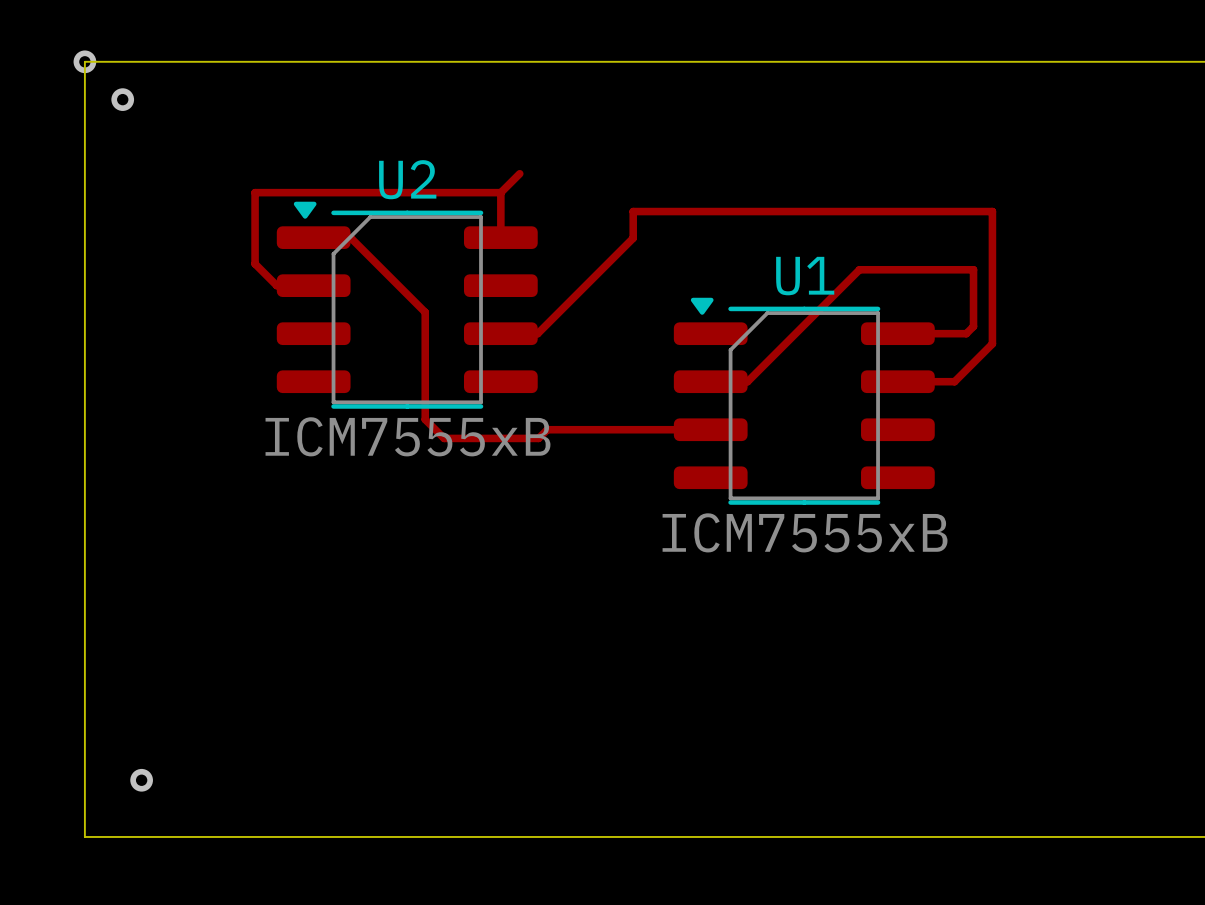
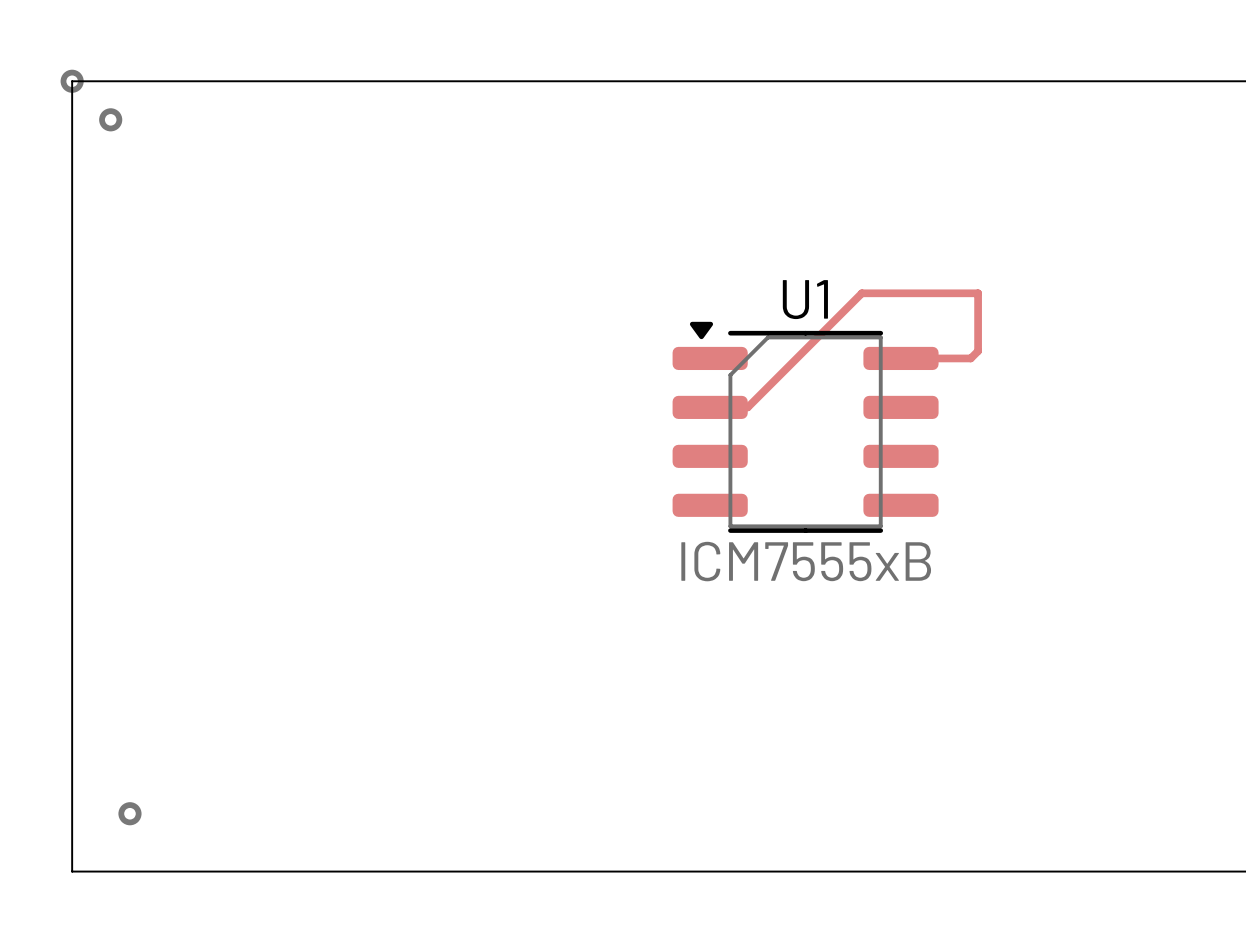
top track: (519, 173) (500, 192) -> none
top track: (500, 192) (255, 192) (255, 263) (276, 285) (313, 285) -> none
top track: (500, 192) (500, 237) -> none
top track: (313, 237) (350, 237) (425, 312) (425, 419) (444, 438) (538, 438) (547, 429) (710, 429) -> none
U2: ICM7555xB (407, 305) -> none
top track: (500, 333) (537, 333) (633, 238) (633, 211) (992, 211) (992, 343) (954, 381) (897, 381) -> none

